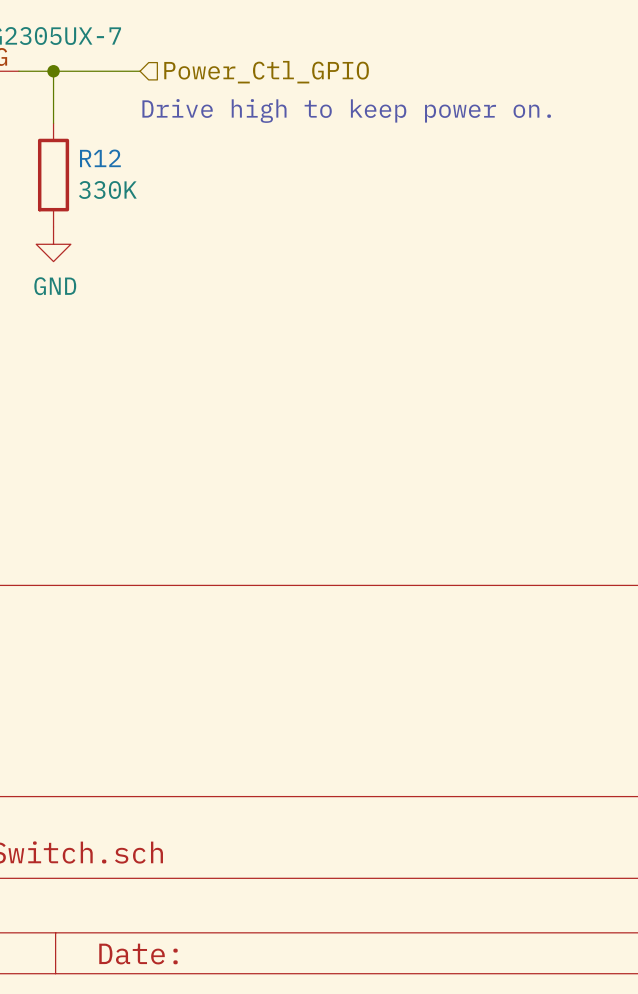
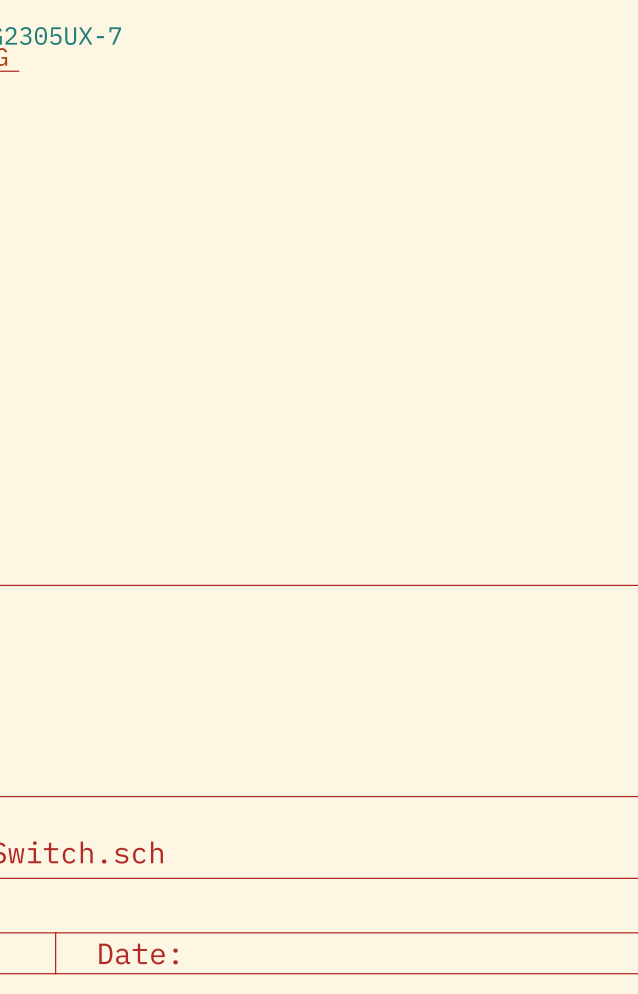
wire: (18, 71) (140, 71) -> none
wire: (53, 71) (53, 123) -> none
junction: (53, 71) -> none
hierarchical label: Power_Ctl_GPIO (266, 72) -> none
text: Drive high to keep power on. (346, 110) -> none
R12: 330K (53, 175) -> none
power symbol: GND (53, 244) -> none

